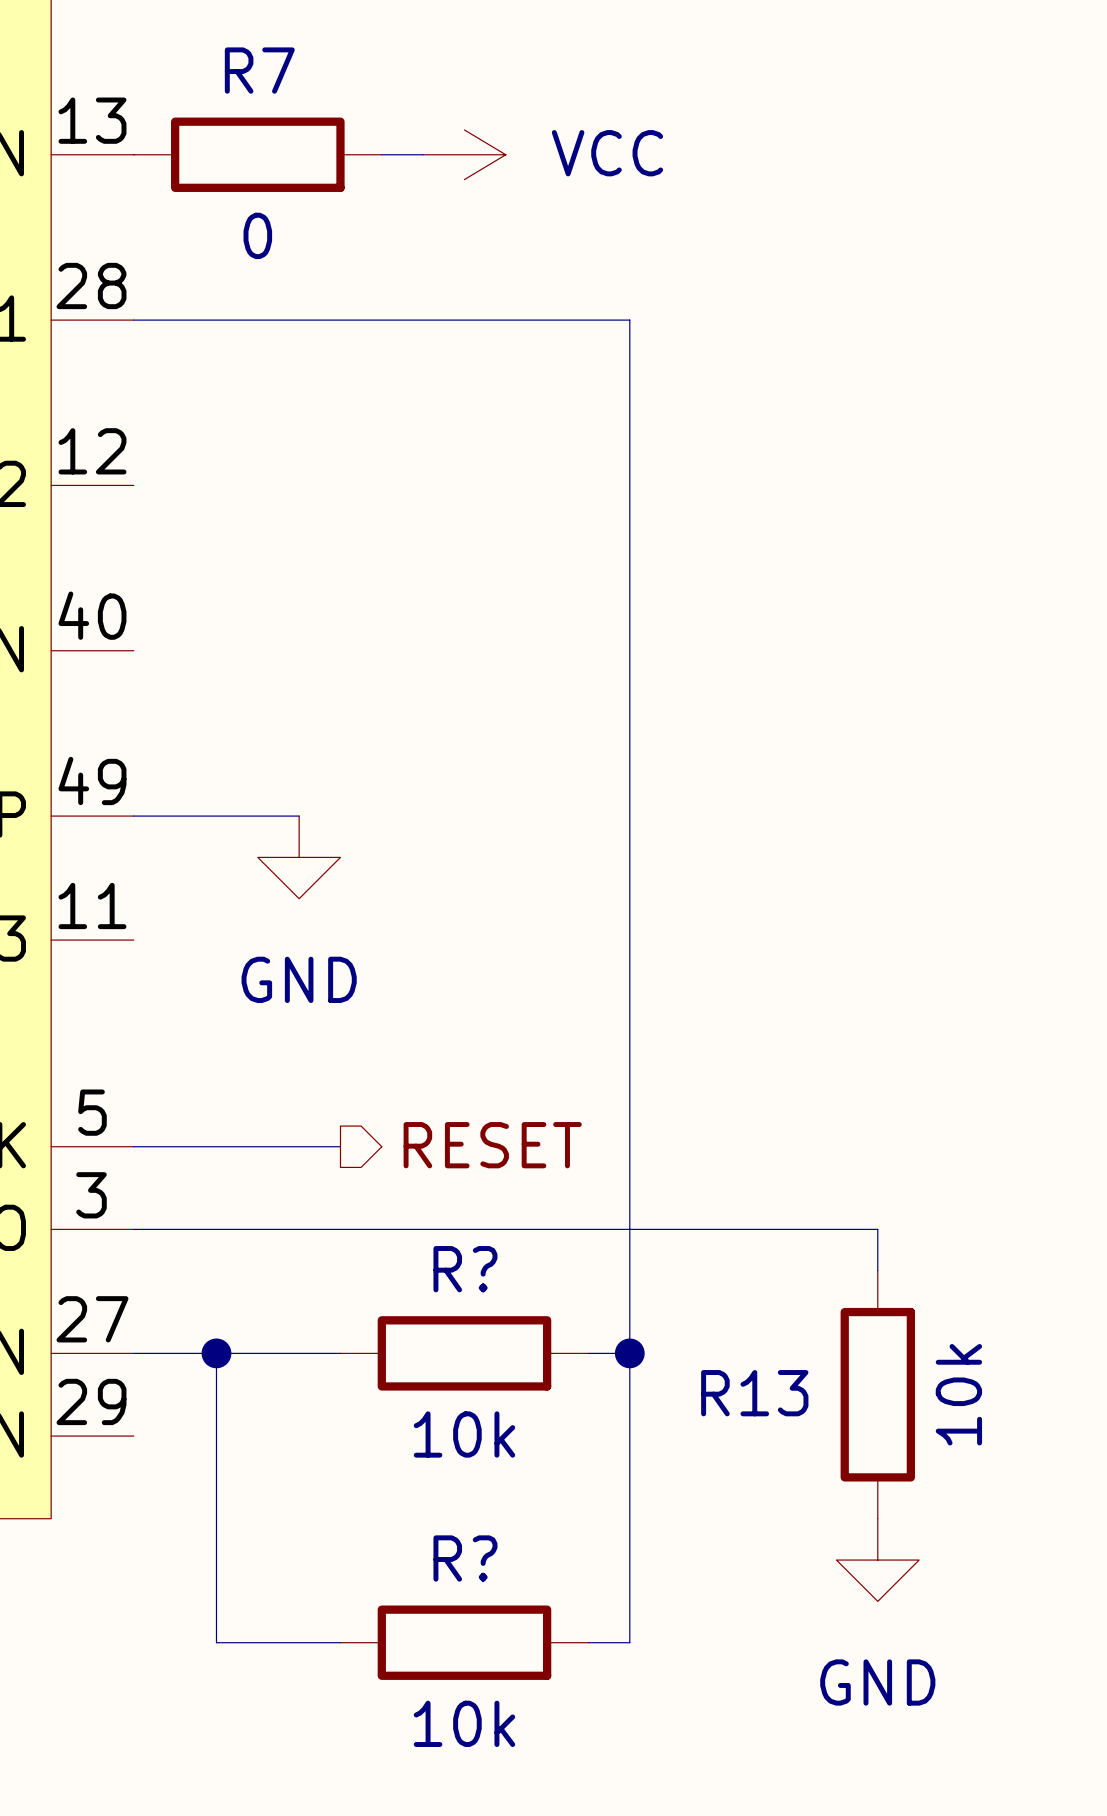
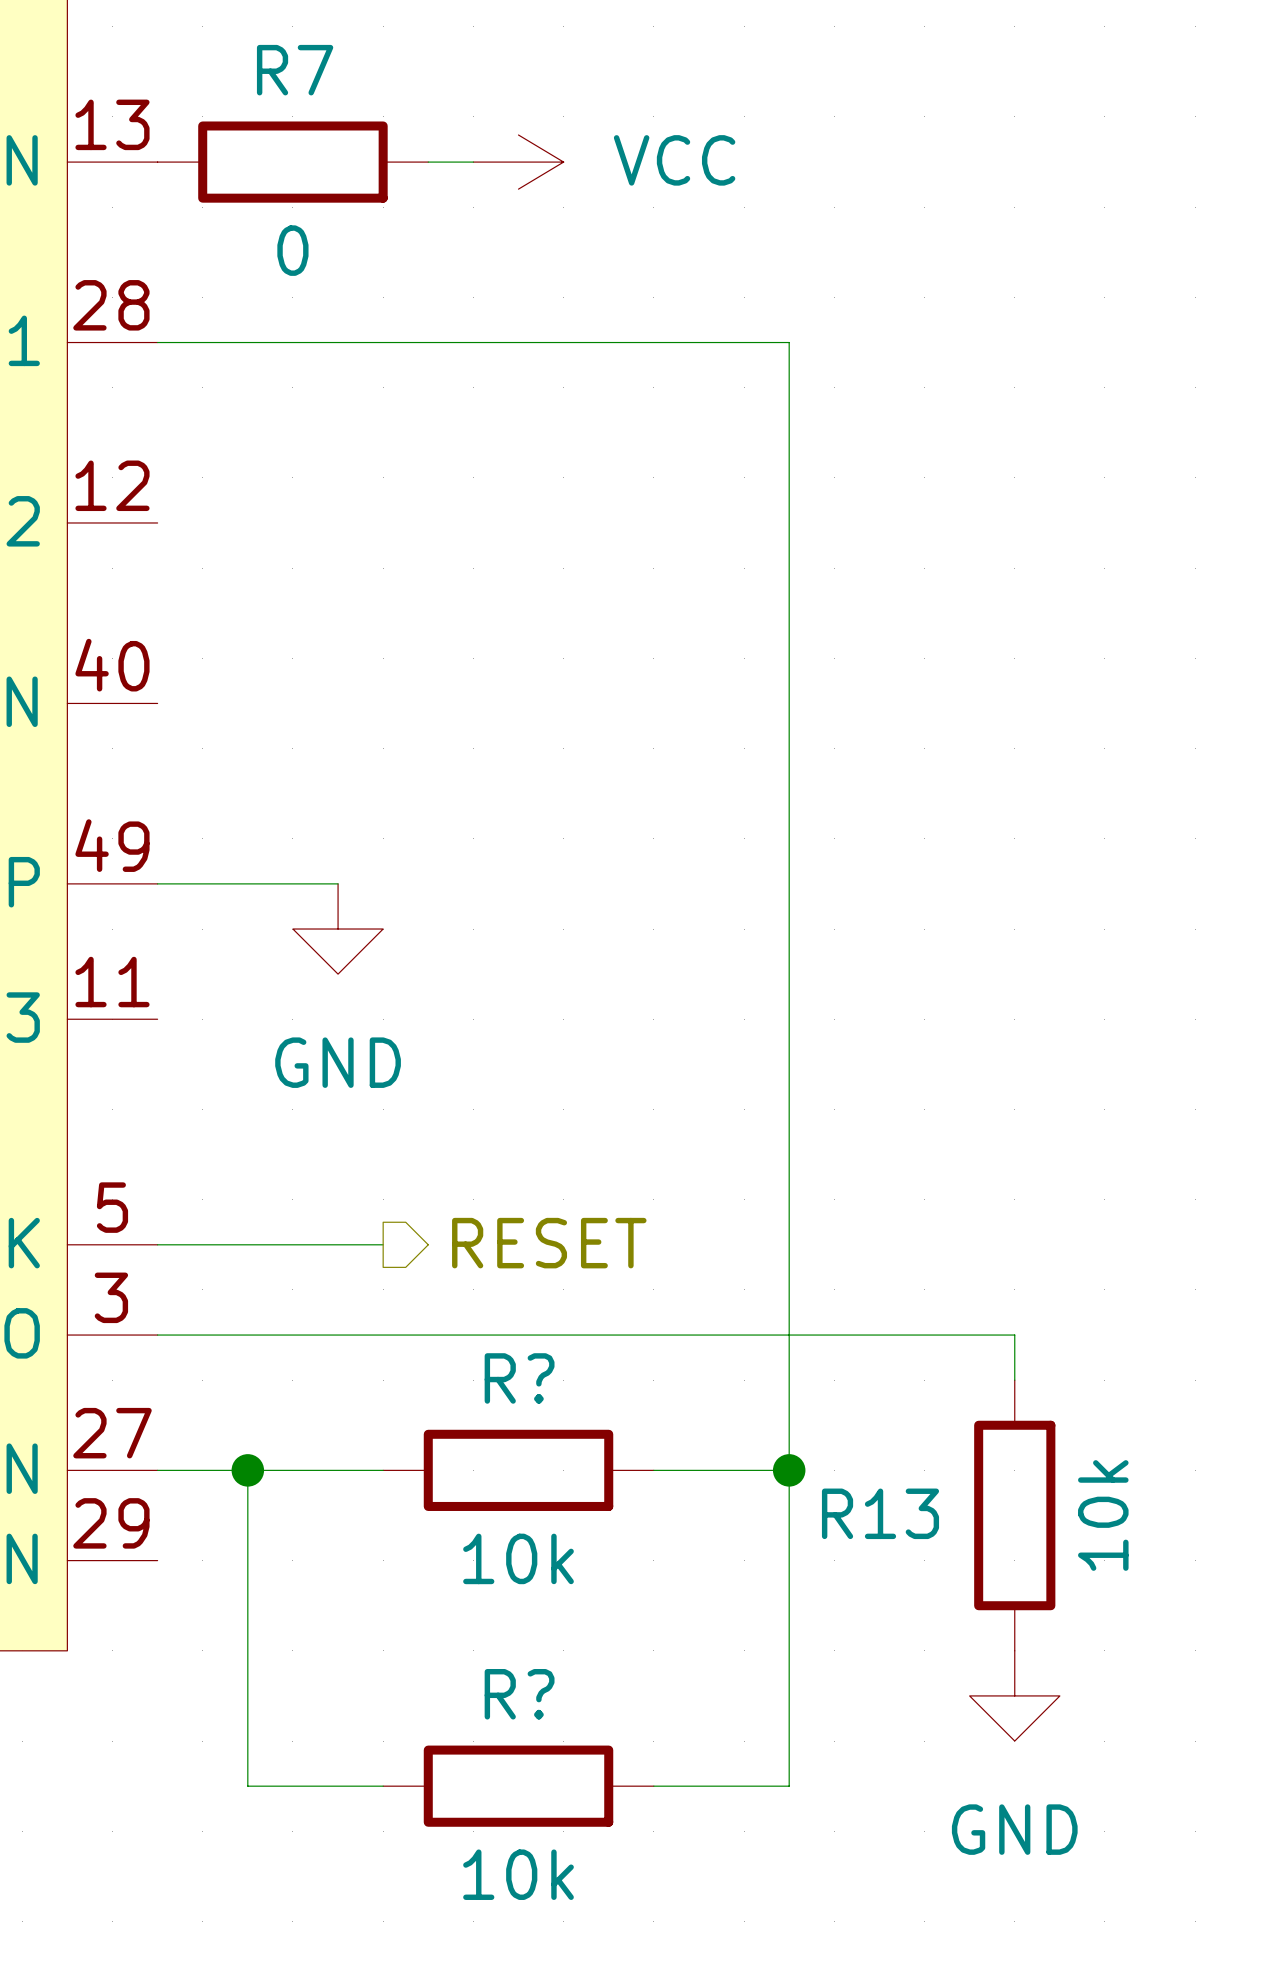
wire: (629, 320) (629, 1642) -> (698, 342) (789, 342) (789, 1786) (698, 1786)
wire: (877, 1229) (877, 1270) -> (969, 1335) (1014, 1335) (1014, 1380)
wire: none -> (698, 1470) (789, 1470)
junction position: (629, 1353) -> (789, 1470)
R13 position: (877, 1394) -> (1014, 1515)
power symbol position: GND (877, 1560) -> GND (1014, 1695)

